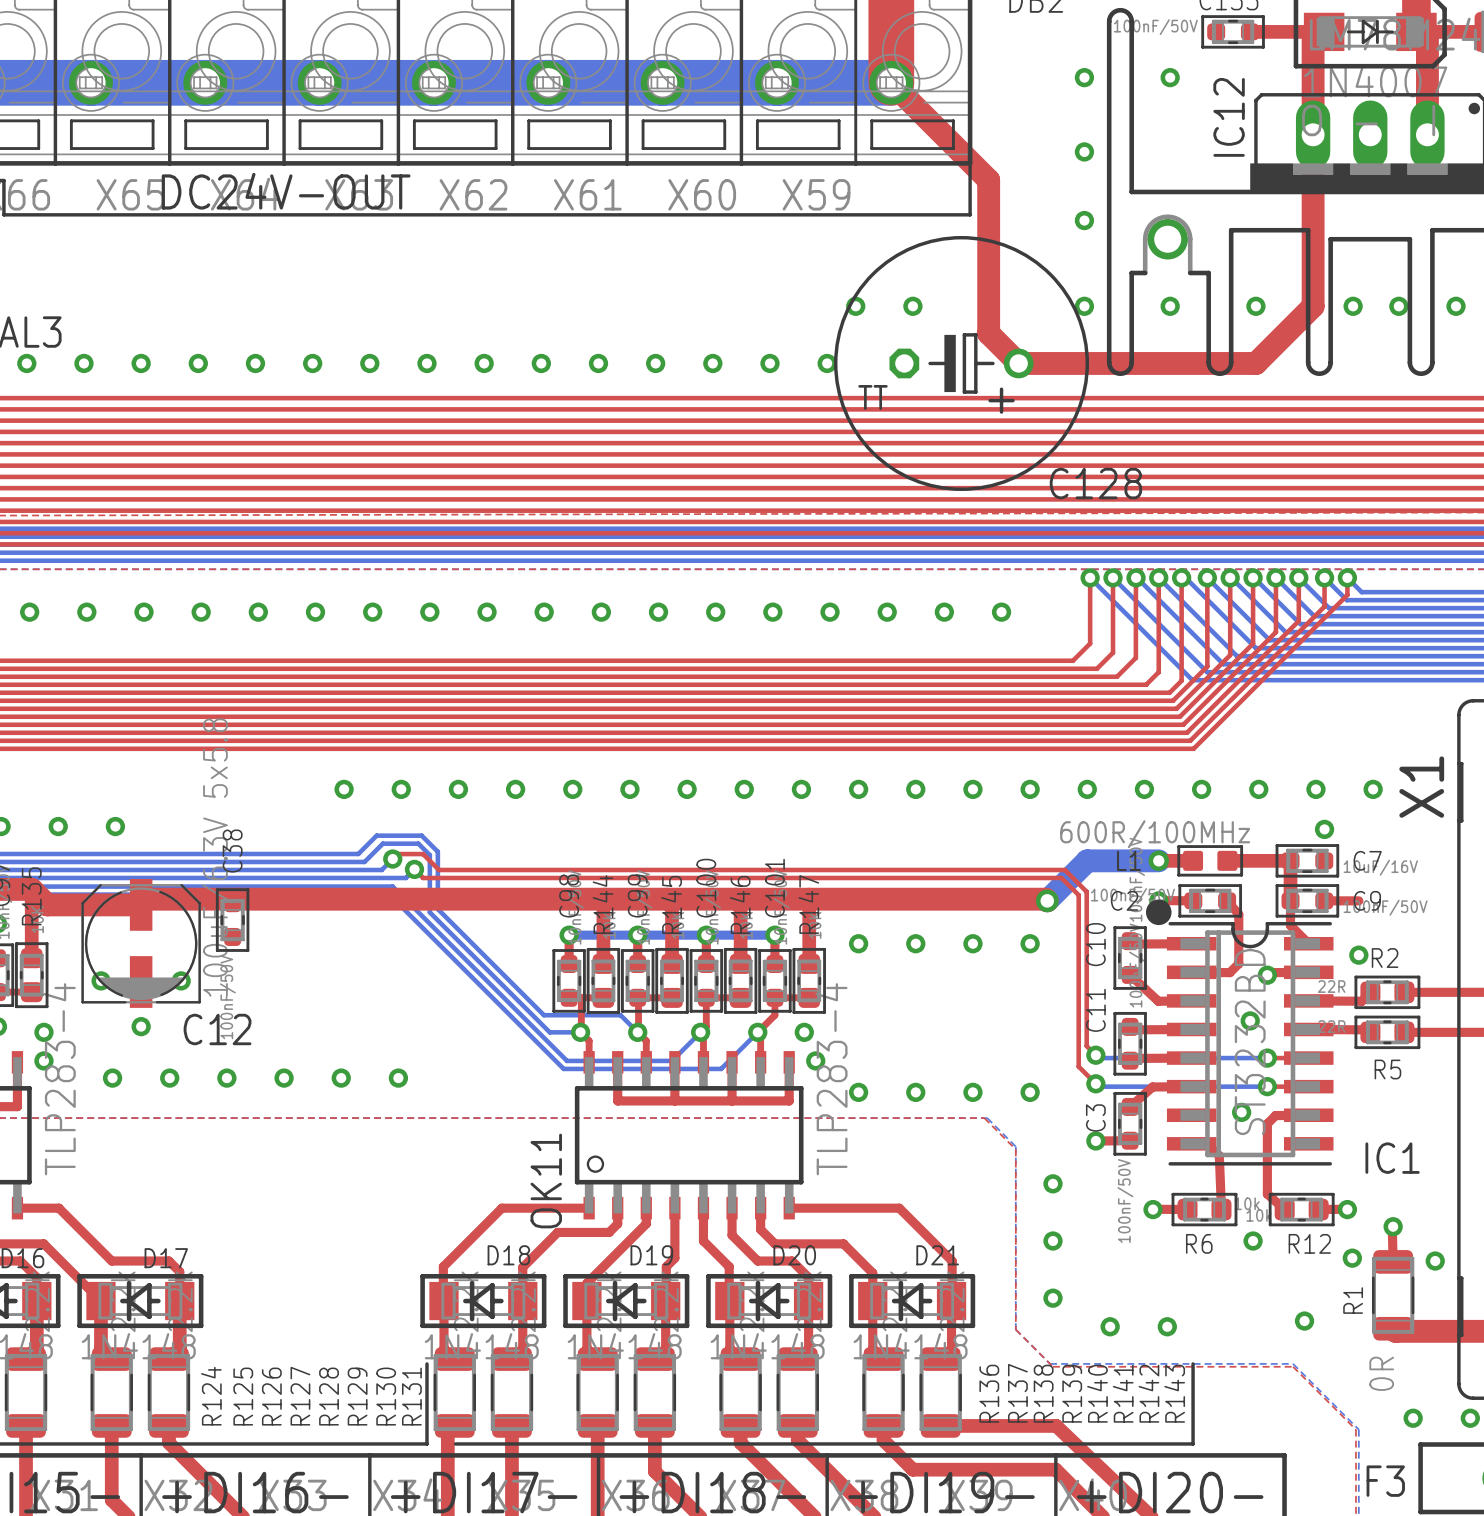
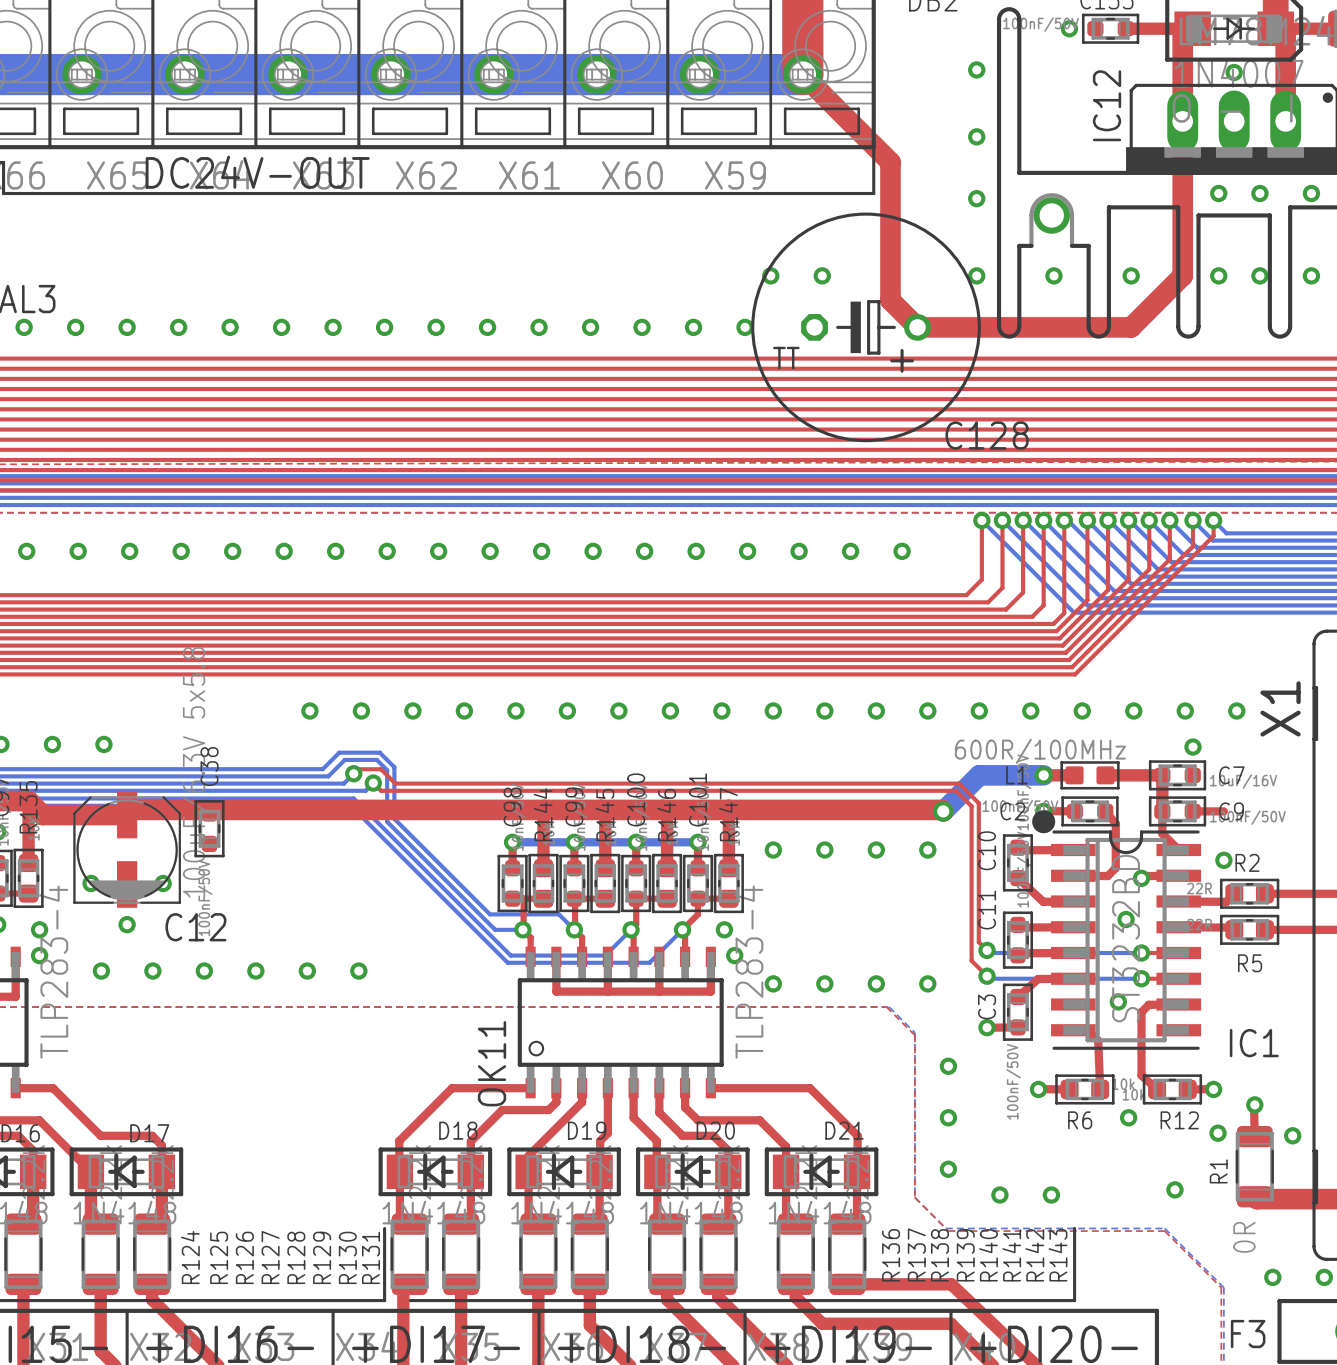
via position: (1170, 77) -> (1069, 28)
via: none -> (1234, 72)
via: none -> (1218, 193)
via: none -> (1259, 193)
via: none -> (1311, 193)

